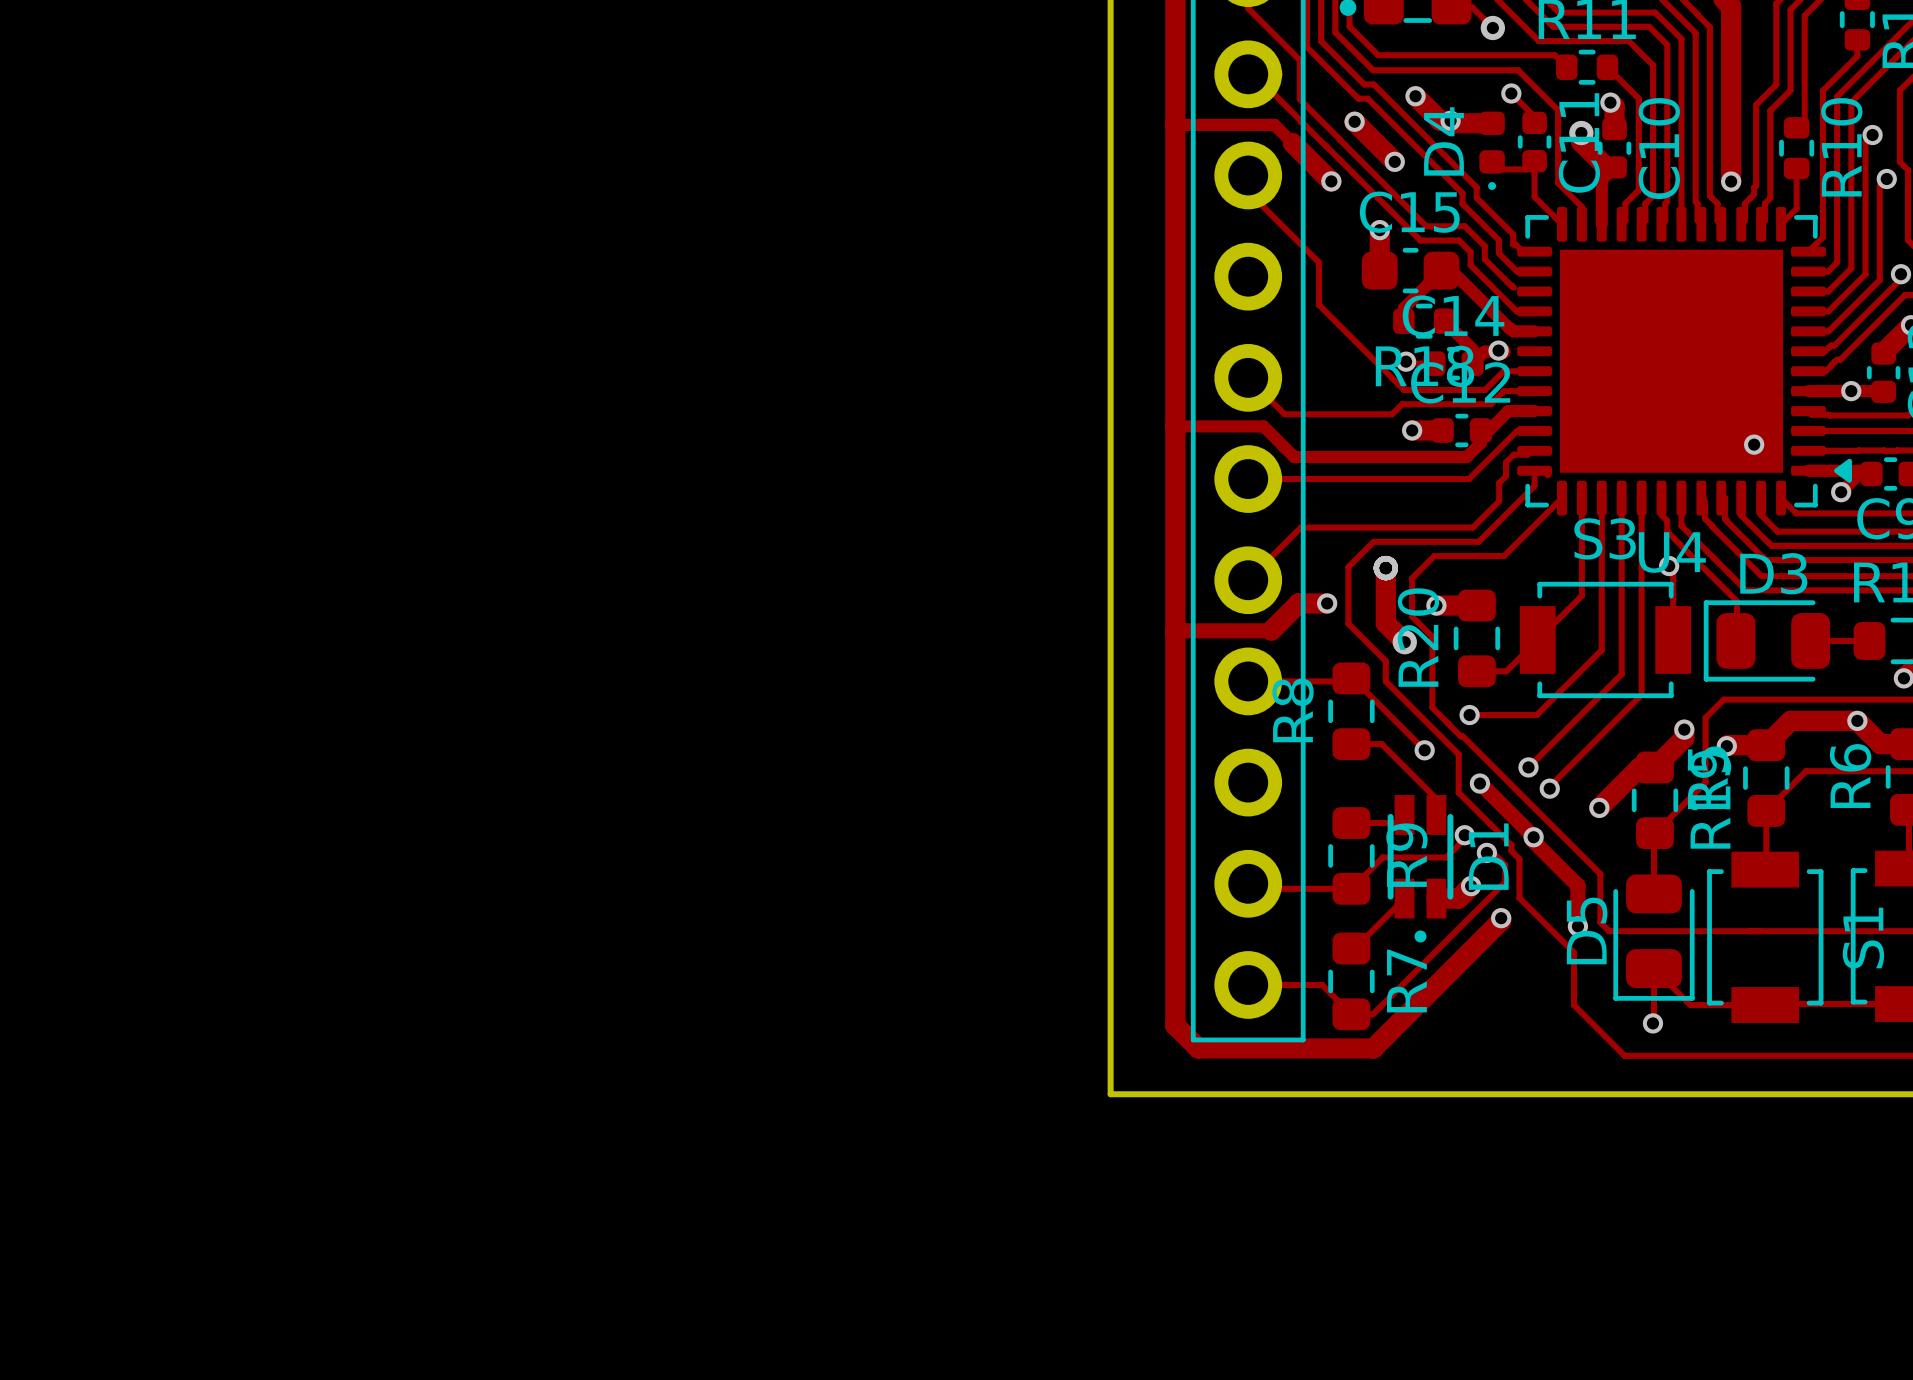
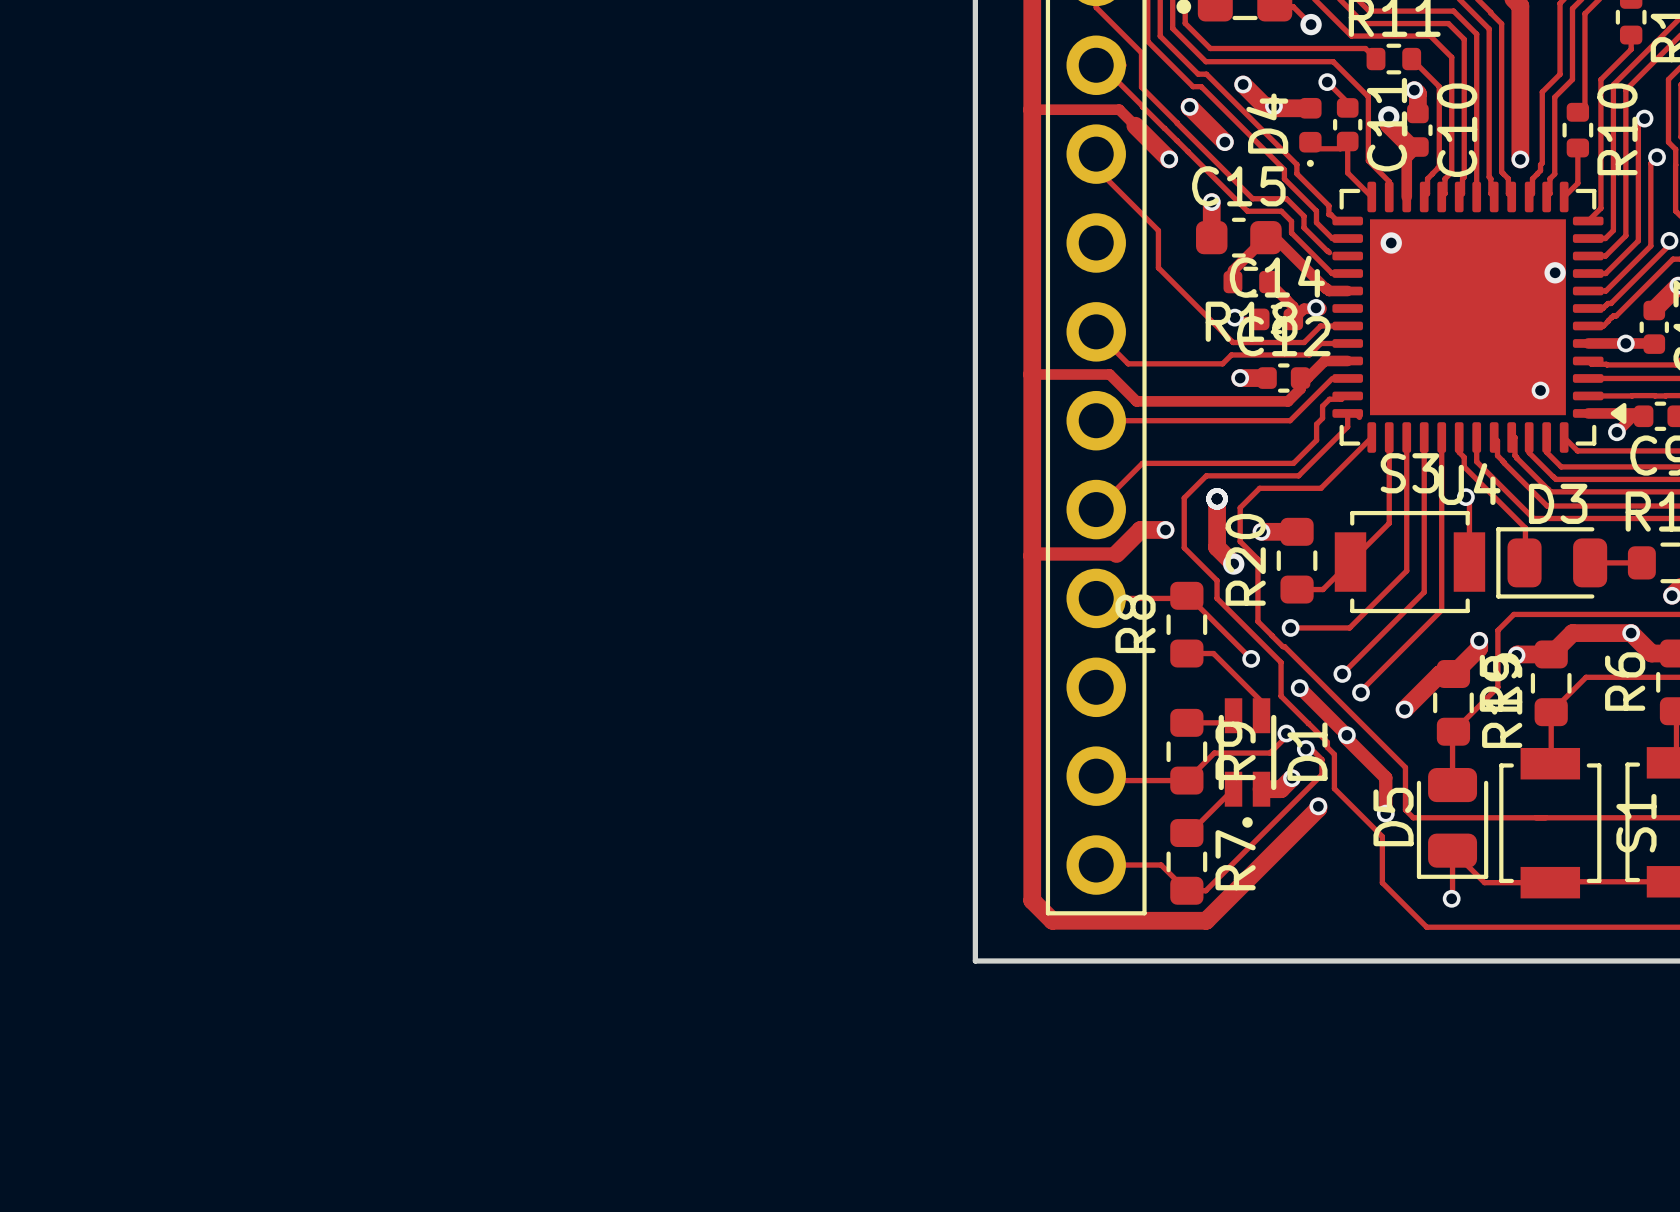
via: none -> (1391, 242)
via: none -> (1555, 272)

